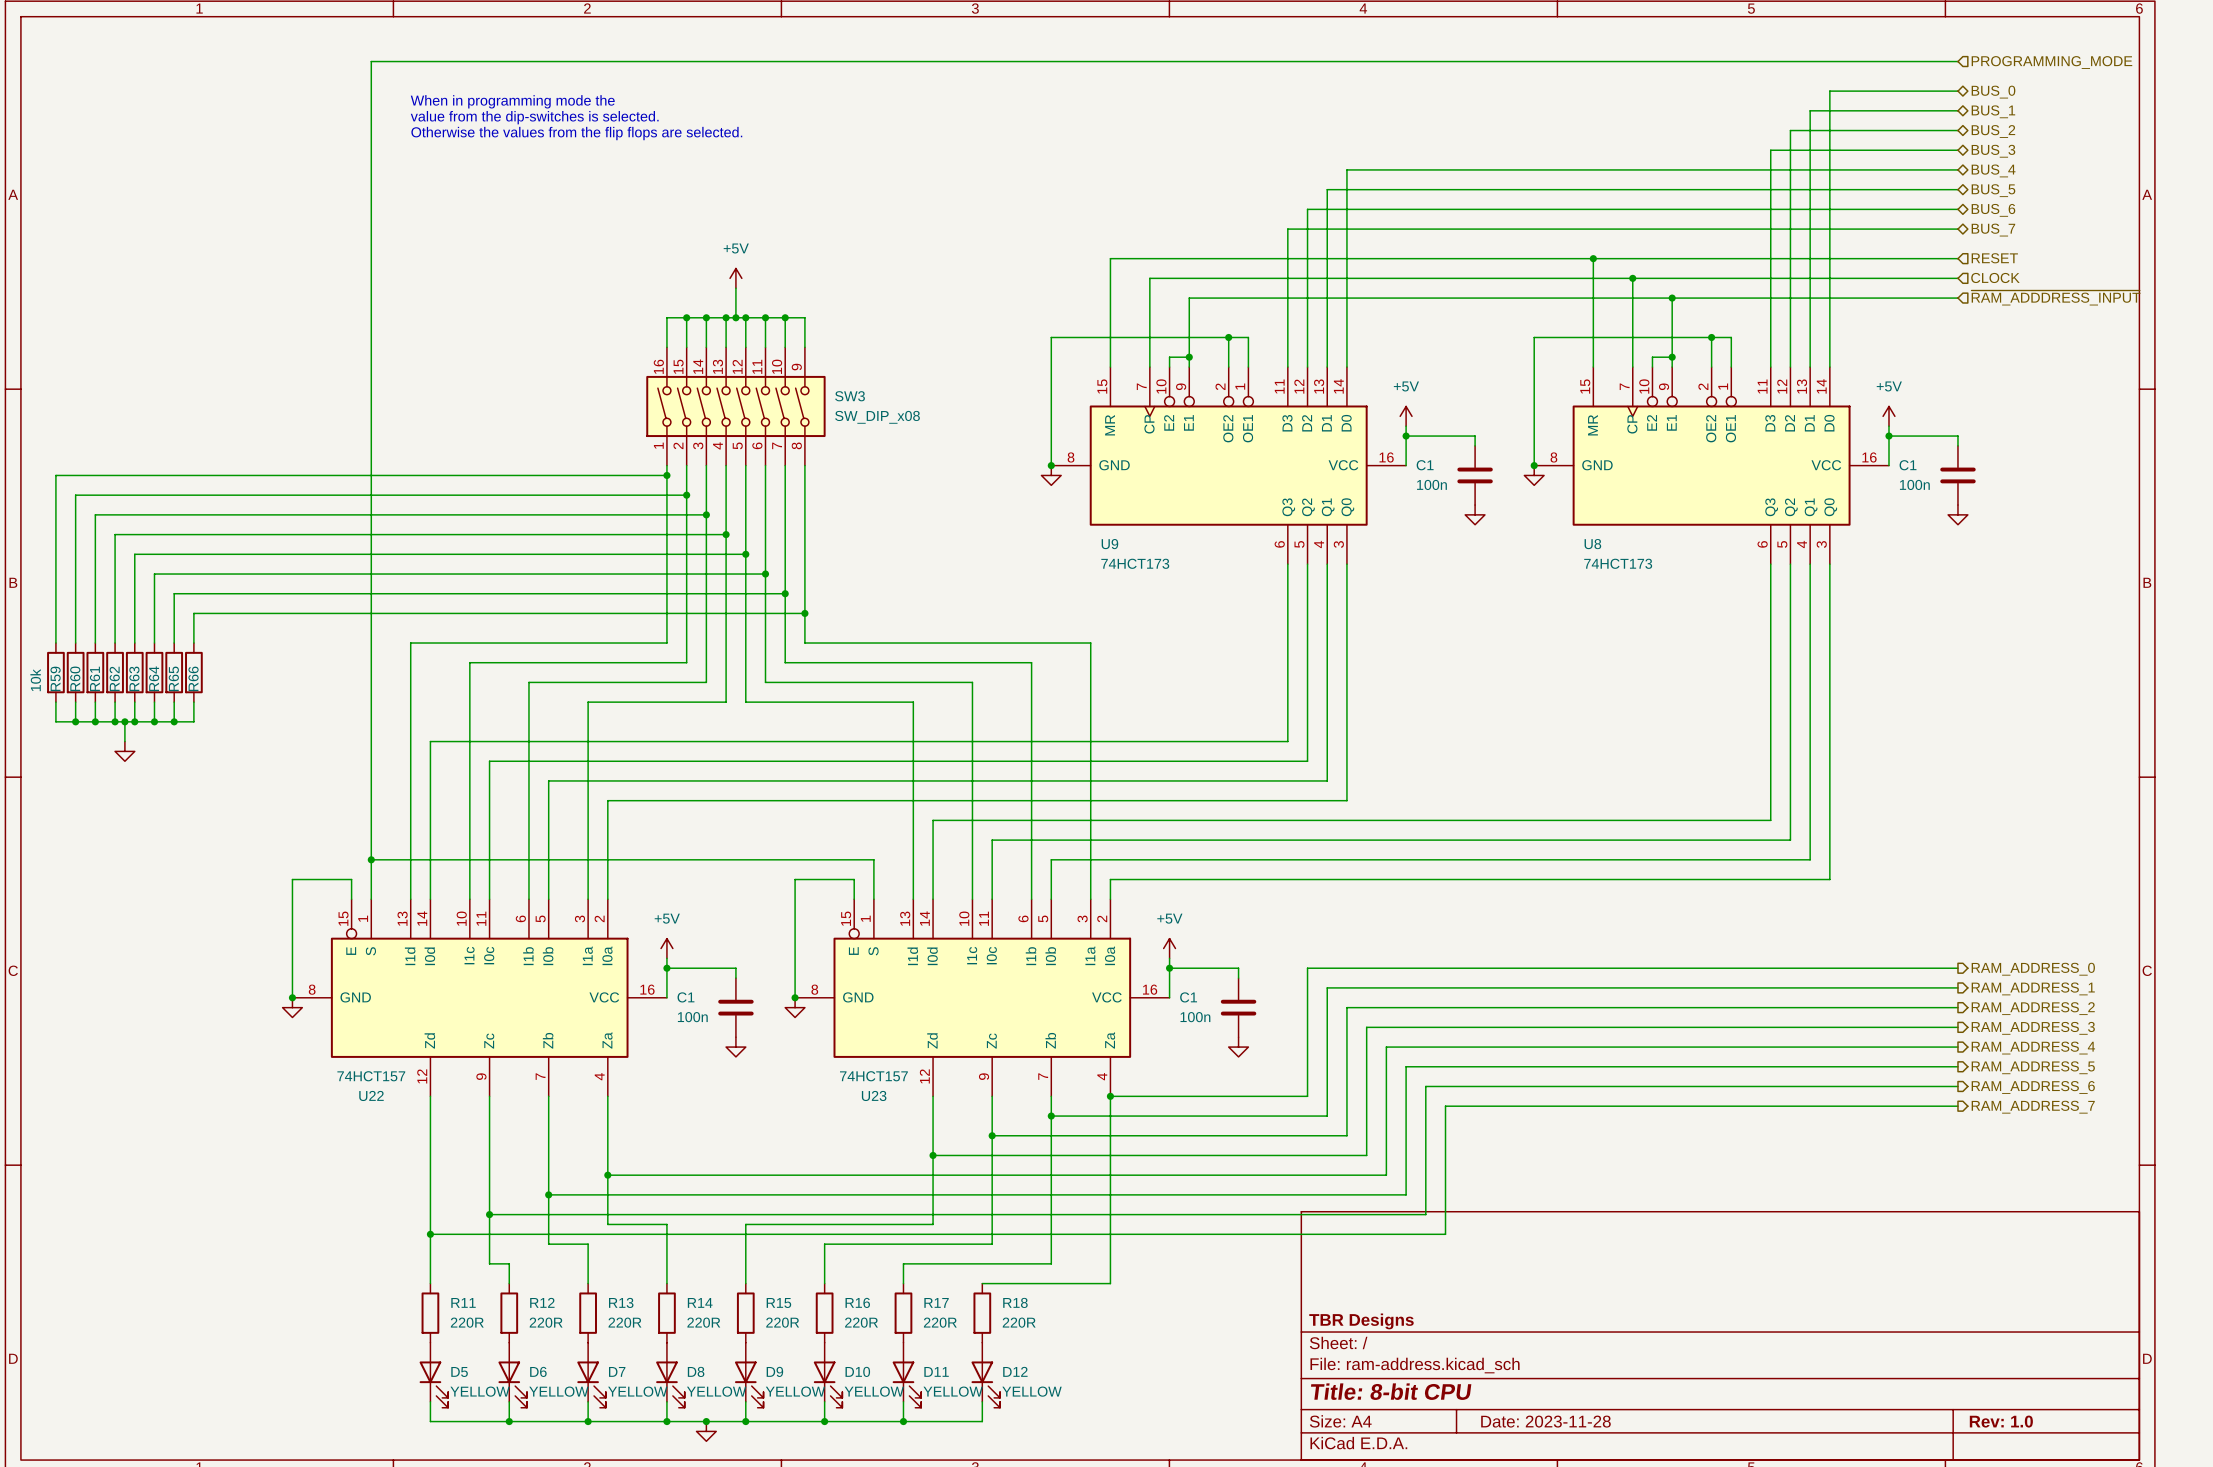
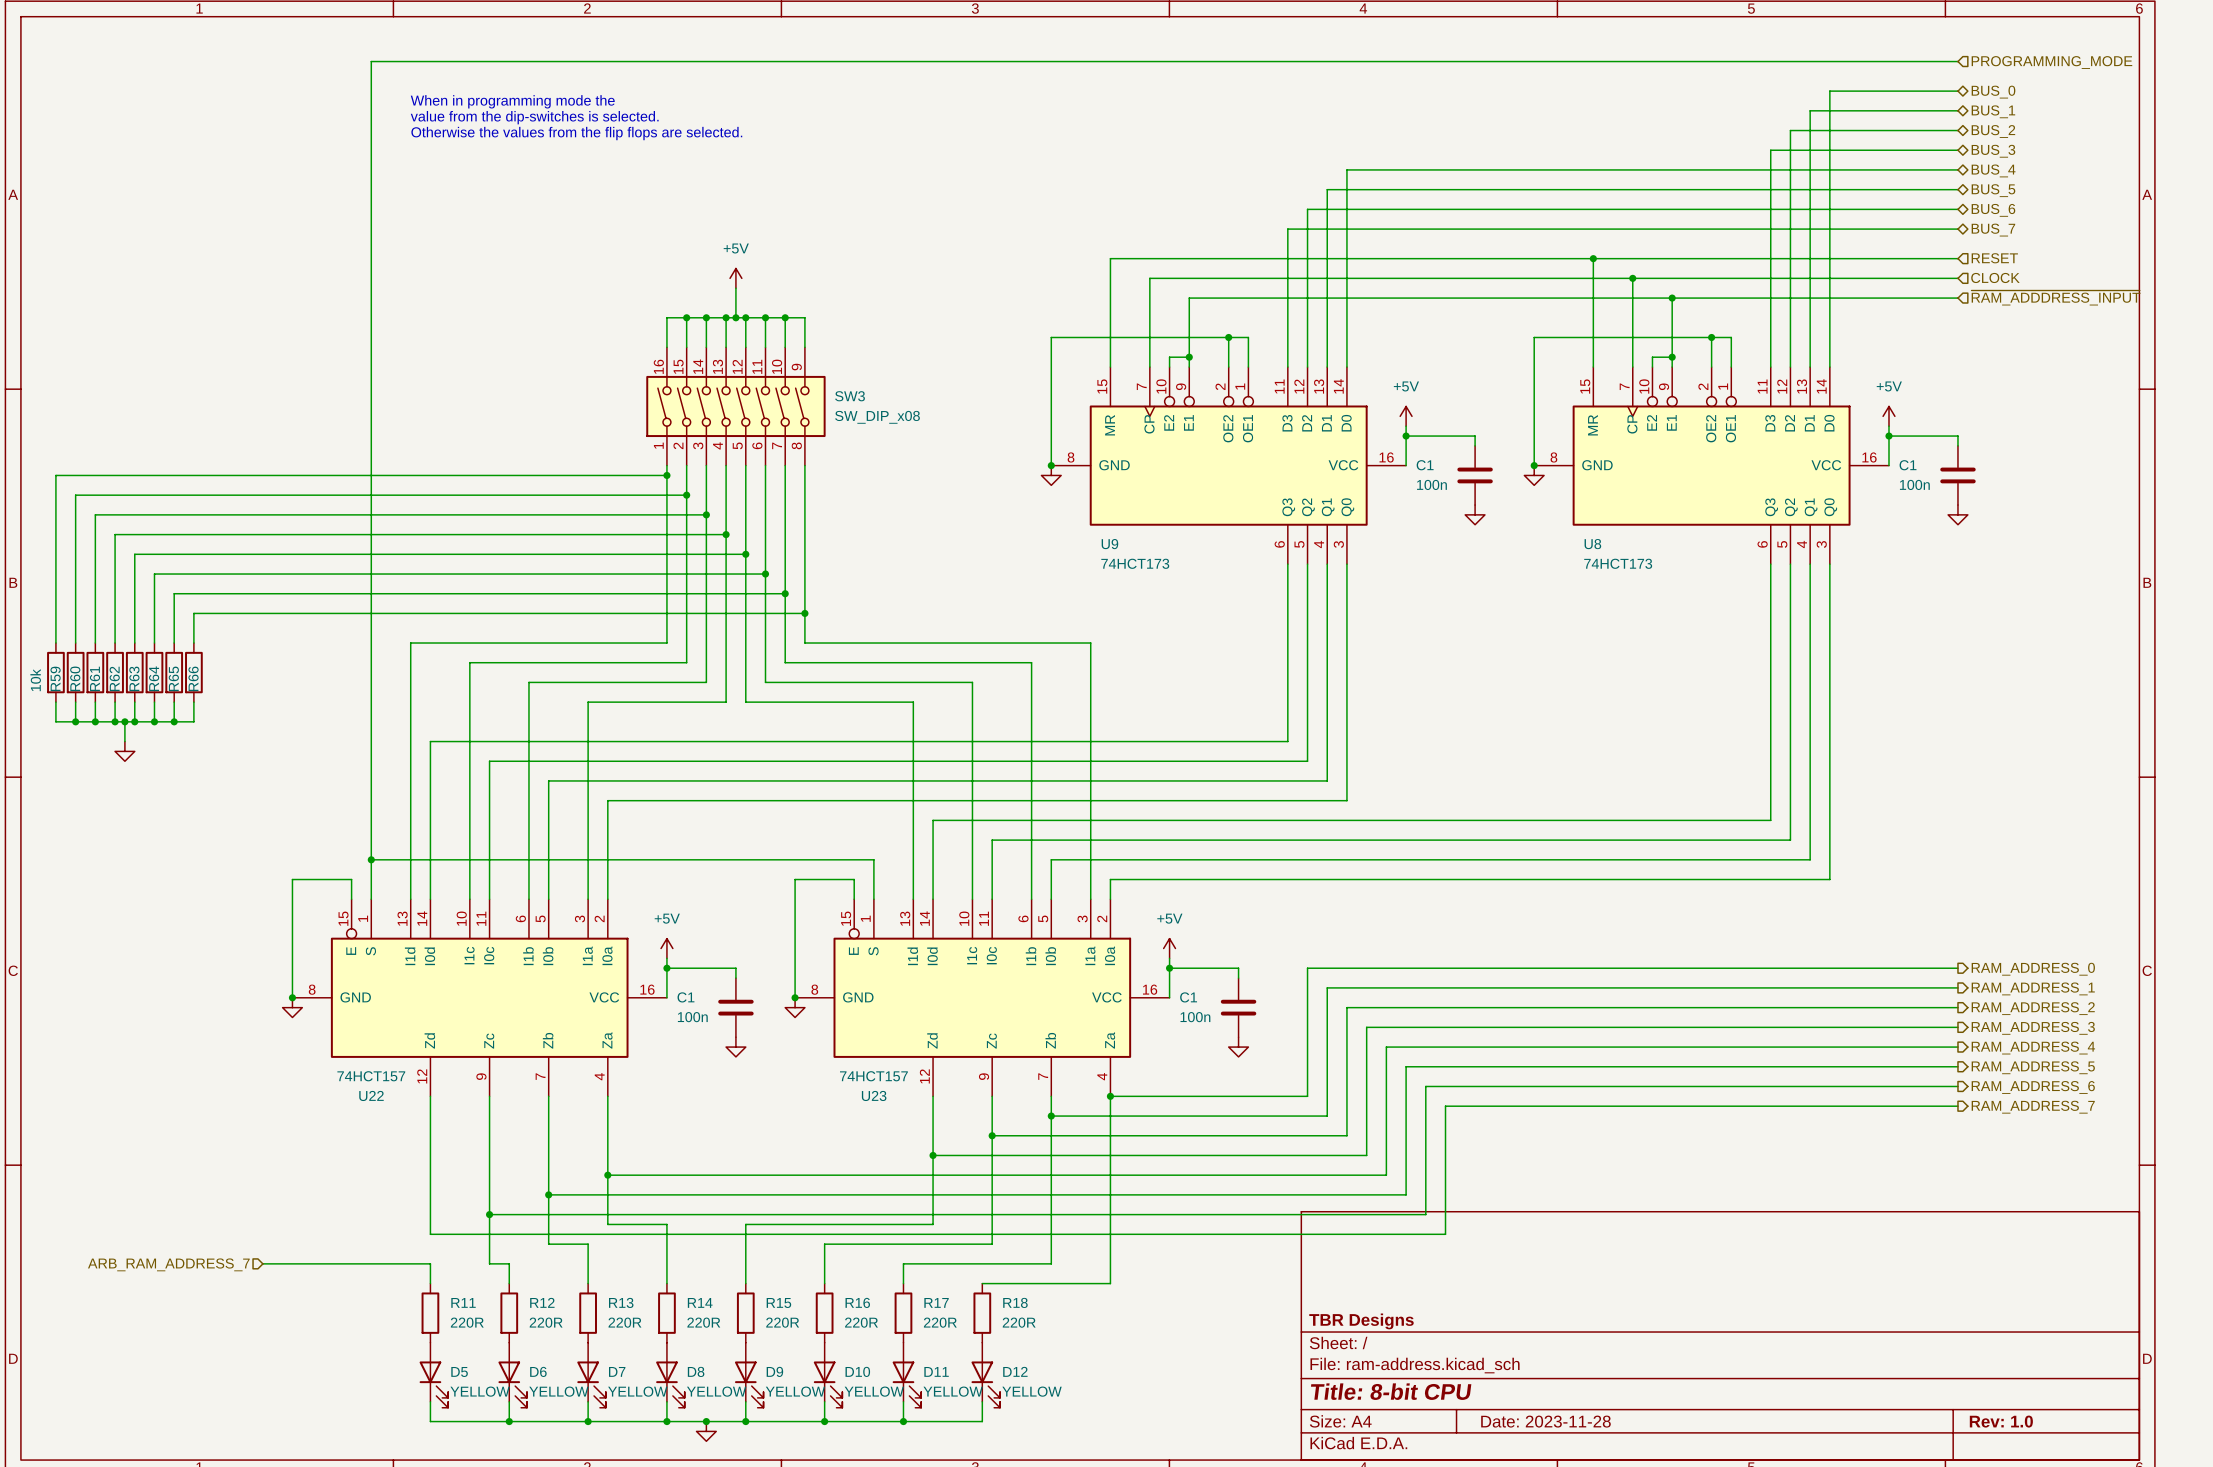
wire: (430, 1234) (430, 1263) -> (262, 1263) (430, 1263)
junction: (430, 1234) -> none
hierarchical label: none -> ARB_RAM_ADDRESS_7 (168, 1264)

